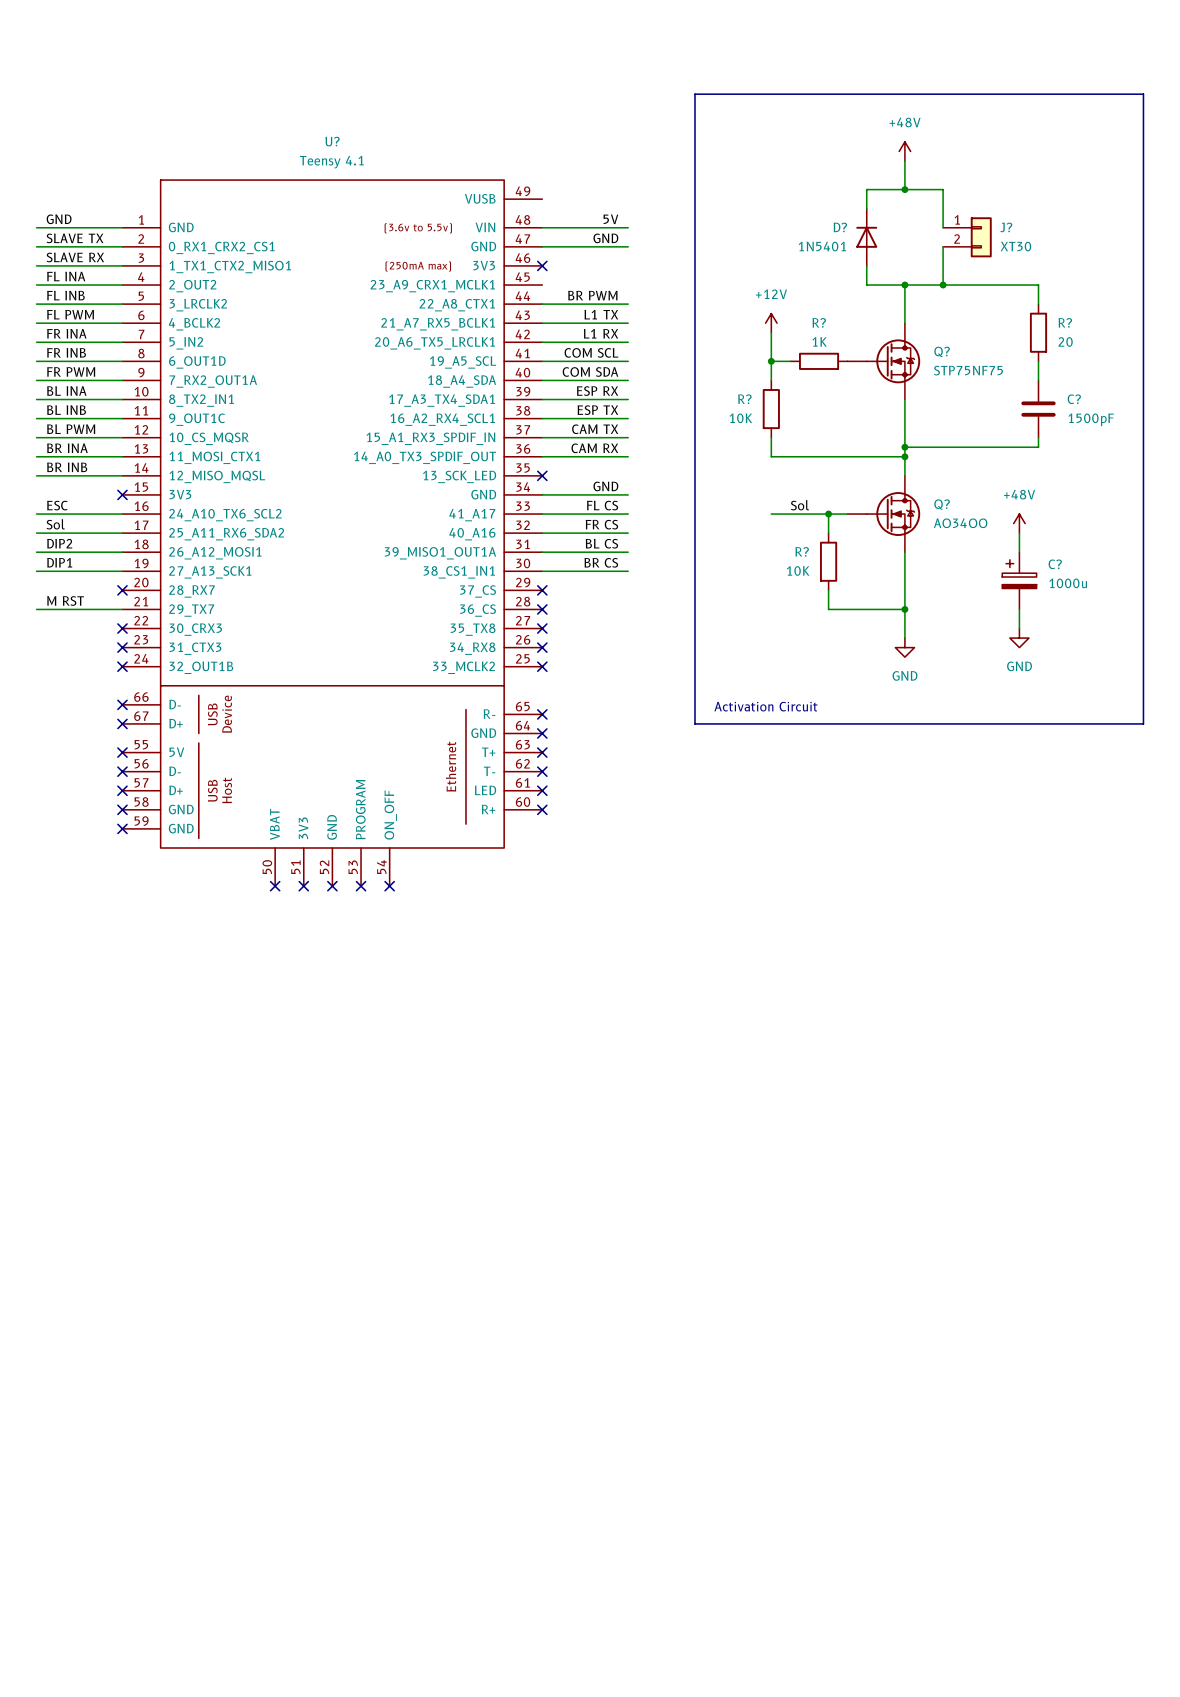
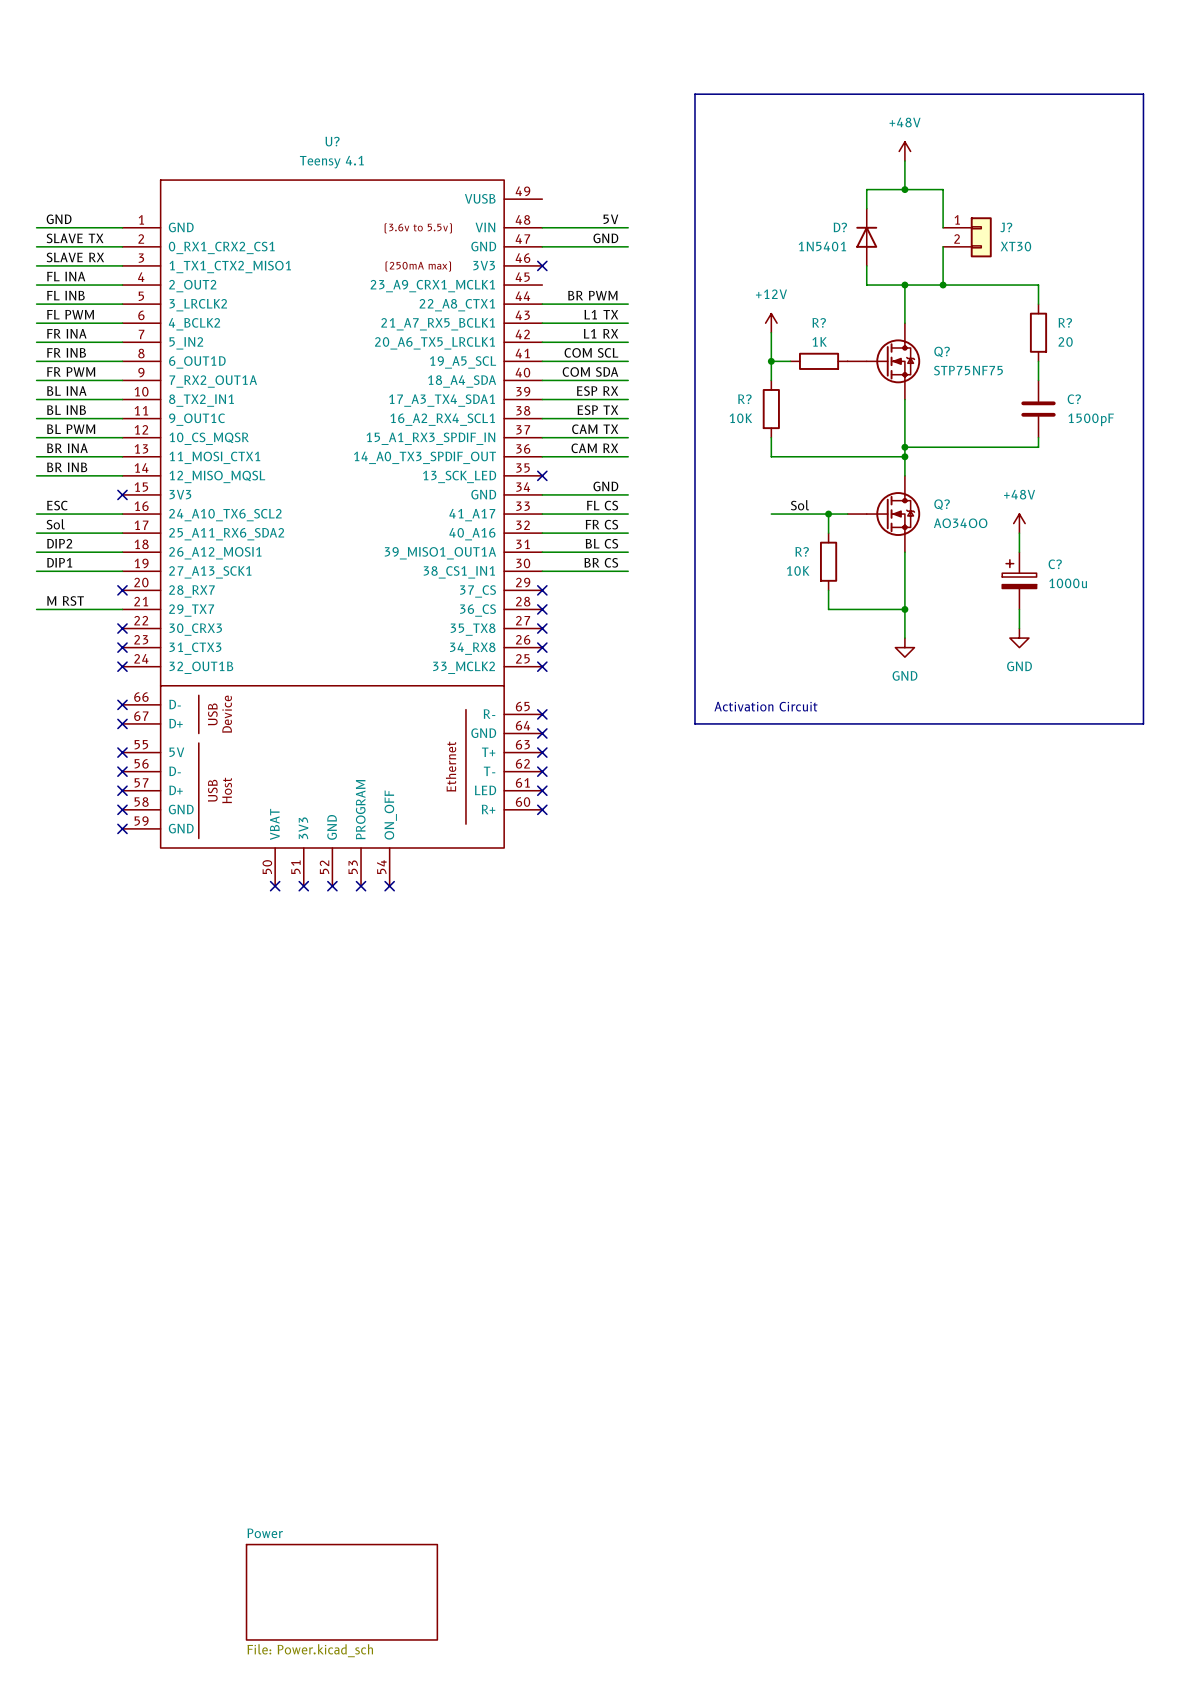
sheet Power: none -> File: Power.kicad_sch (341, 1592)

